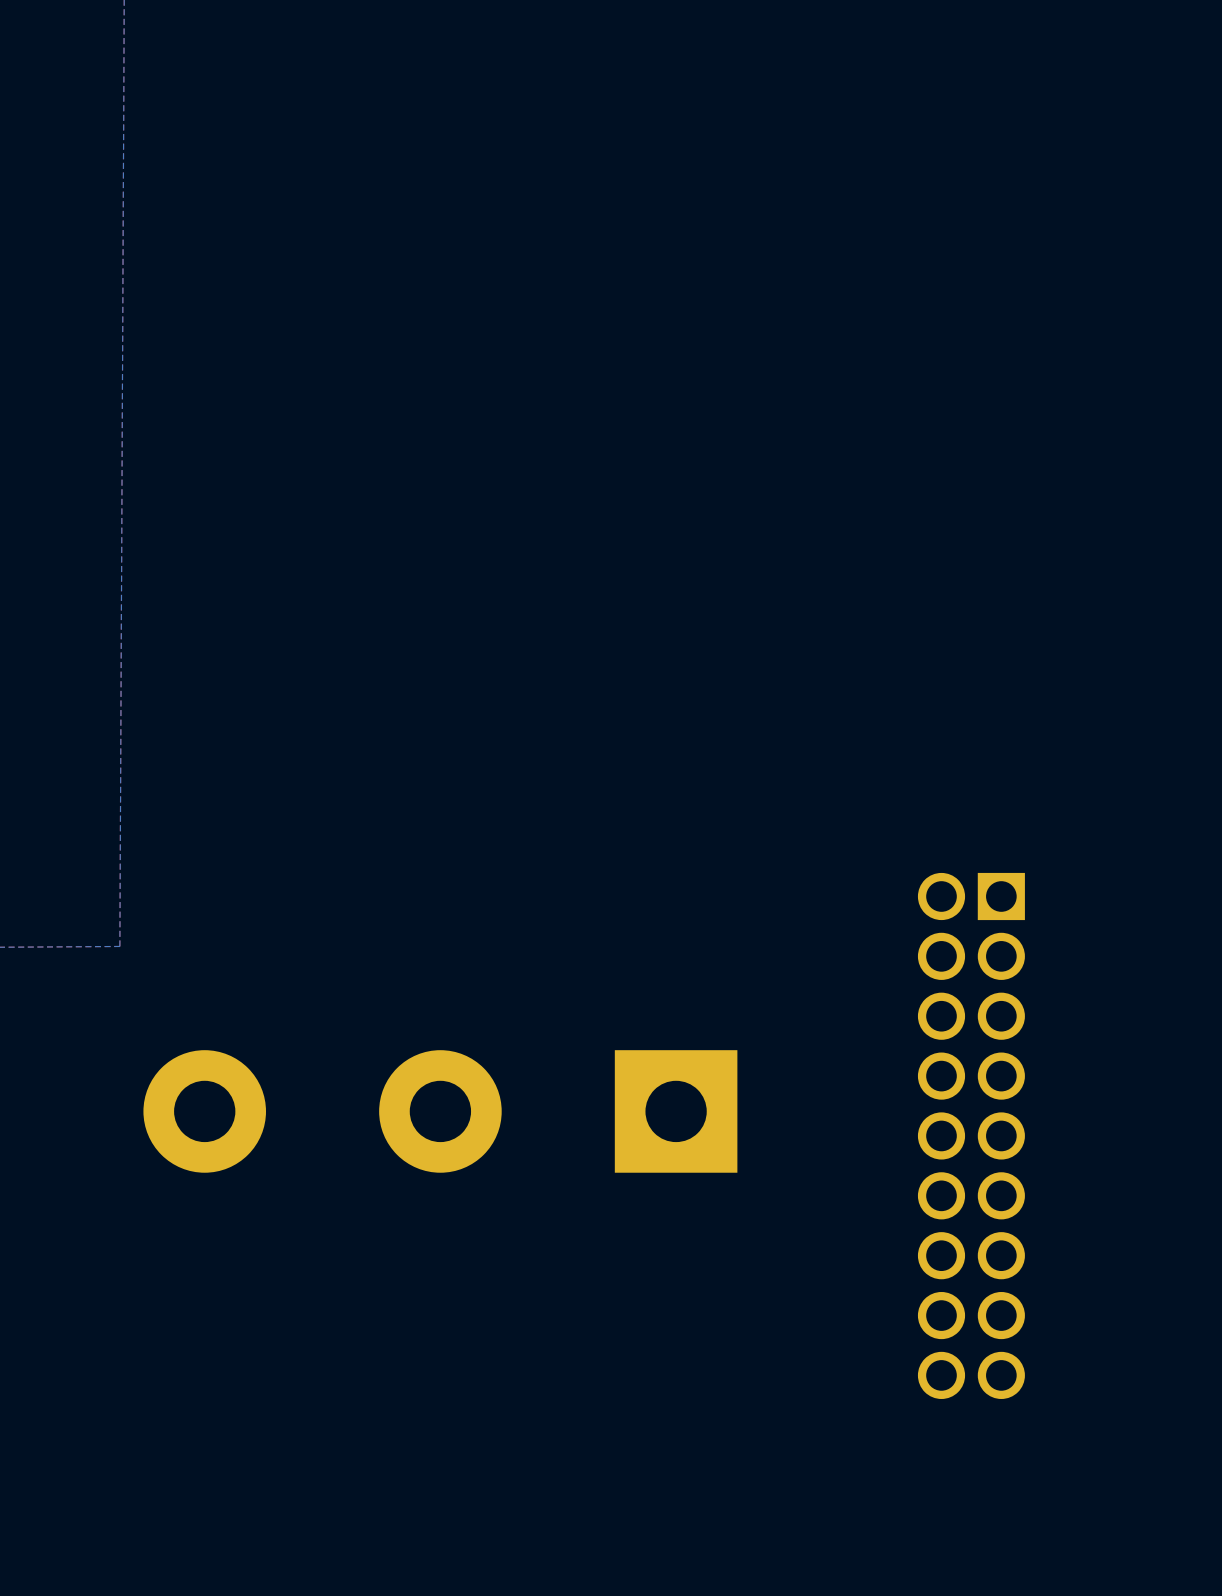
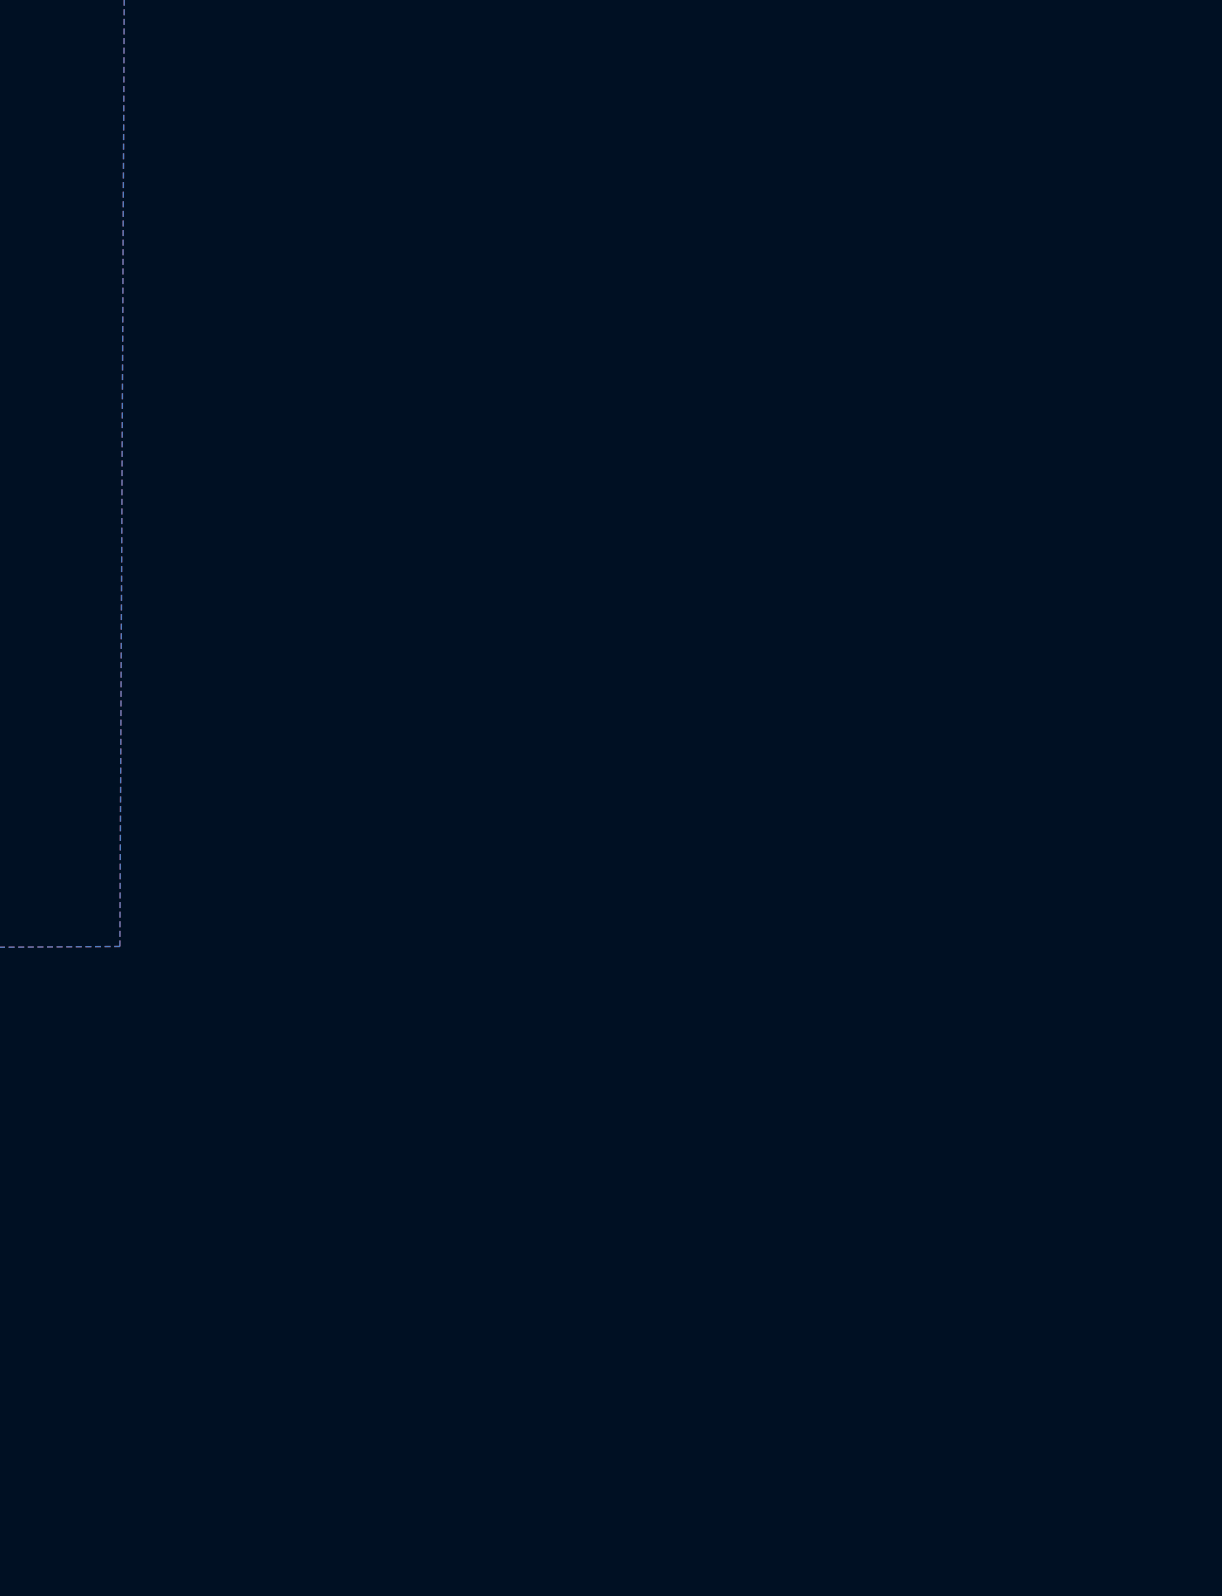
part: (440, 1111) -> none
part: (971, 1135) -> none

